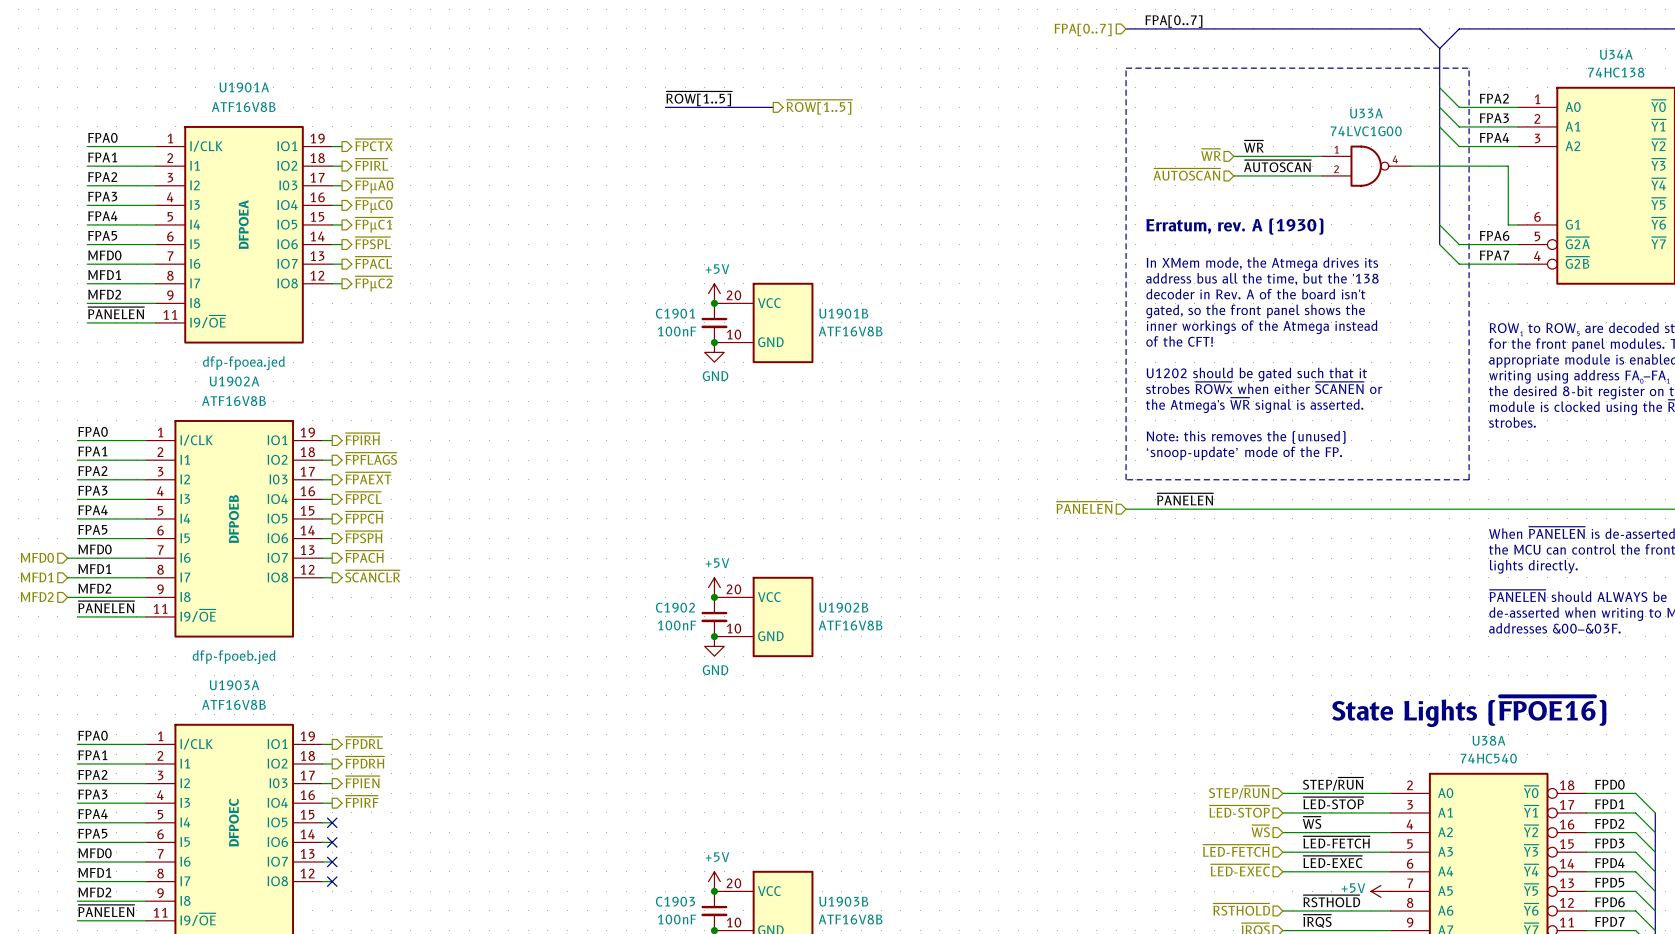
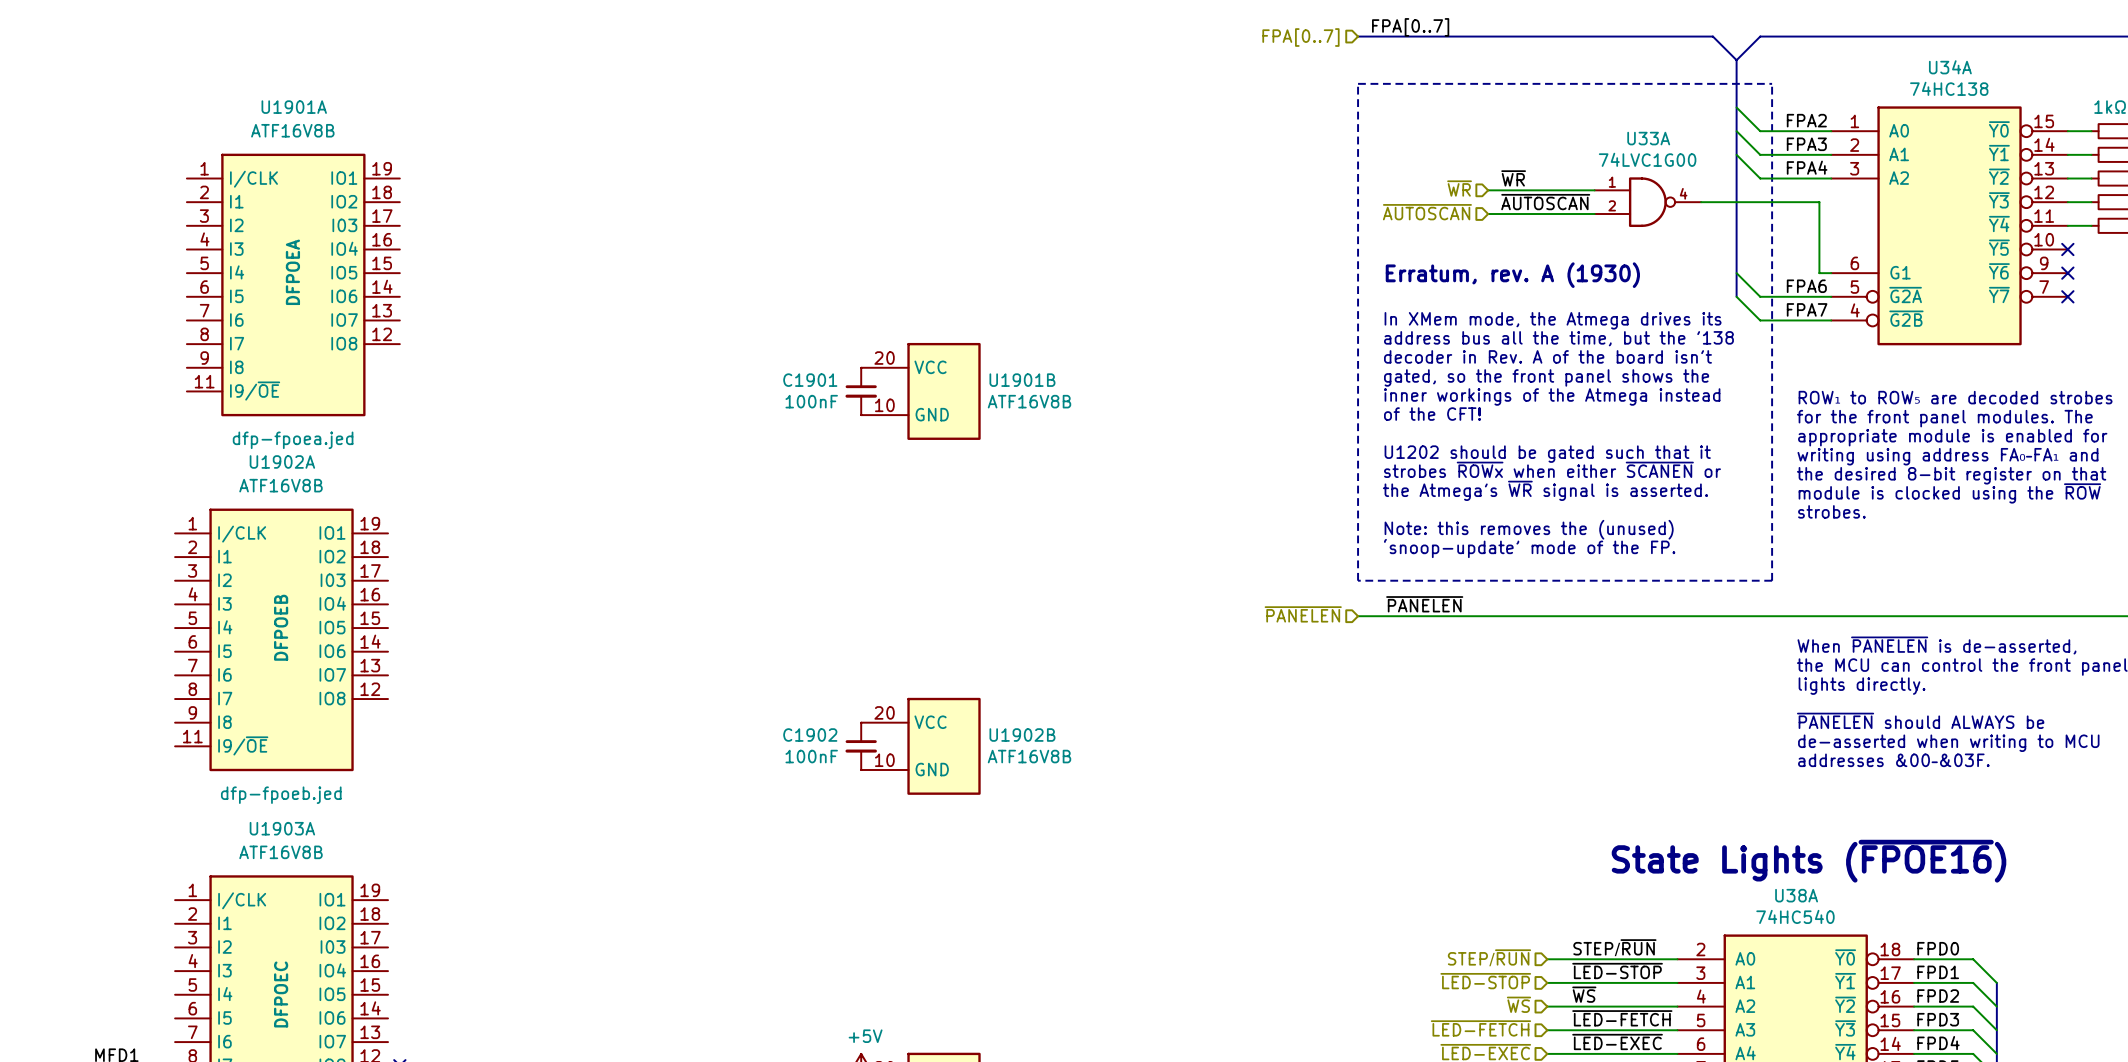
label: ~{ROW[1..5]} (699, 98) -> none
bus: (665, 107) (773, 107) -> none
hierarchical label: ~{ROW[1..5]} (819, 107) -> none
label: FPA0 (102, 137) -> none
hierarchical label: ~{FPCTX} (374, 145) -> none
wire: (87, 146) (155, 146) -> none
wire: (332, 146) (342, 146) -> none
label: FPA1 (102, 157) -> none
hierarchical label: ~{FPIRL} (371, 164) -> none
wire: (87, 166) (155, 166) -> none
wire: (332, 166) (342, 166) -> none
label: FPA2 (102, 177) -> none
wire: (87, 185) (155, 185) -> none
wire: (332, 185) (342, 185) -> none
hierarchical label: ~{FPµA0} (374, 185) -> none
label: FPA3 (102, 196) -> none
wire: (87, 205) (155, 205) -> none
wire: (332, 205) (342, 205) -> none
hierarchical label: ~{FPµC0} (374, 205) -> none
label: FPA4 (102, 216) -> none
wire: (87, 224) (155, 224) -> none
wire: (332, 224) (342, 224) -> none
hierarchical label: ~{FPµC1} (374, 225) -> none
label: FPA5 (102, 235) -> none
hierarchical label: ~{FPSPL} (373, 243) -> none
wire: (87, 244) (155, 244) -> none
wire: (332, 244) (342, 244) -> none
label: MFD0 (104, 255) -> none
hierarchical label: ~{FPACL} (373, 262) -> none
wire: (87, 264) (155, 264) -> none
wire: (332, 264) (342, 264) -> none
label: MFD1 (104, 275) -> none
wire: (87, 283) (155, 283) -> none
wire: (332, 283) (342, 283) -> none
hierarchical label: ~{FPµC2} (374, 283) -> none
power symbol: +5V (714, 293) -> none
label: MFD2 (104, 294) -> none
wire: (87, 303) (155, 303) -> none
junction: (714, 303) -> none
label: ~{PANELEN} (116, 313) -> none
wire: (87, 322) (155, 322) -> none
junction: (714, 342) -> none
power symbol: GND (714, 352) -> none
label: FPA0 (93, 431) -> none
hierarchical label: ~{FPIRH} (362, 439) -> none
wire: (77, 440) (146, 440) -> none
wire: (322, 440) (332, 440) -> none
label: FPA1 (92, 451) -> none
hierarchical label: ~{FPFLAGS} (371, 458) -> none
wire: (77, 460) (146, 460) -> none
wire: (322, 460) (332, 460) -> none
label: FPA2 (92, 471) -> none
hierarchical label: ~{FPAEXT} (368, 478) -> none
wire: (77, 479) (146, 479) -> none
wire: (322, 479) (332, 479) -> none
label: FPA3 (92, 490) -> none
hierarchical label: ~{FPPCL} (363, 497) -> none
wire: (77, 499) (146, 499) -> none
wire: (322, 499) (332, 499) -> none
label: FPA4 (93, 510) -> none
hierarchical label: ~{FPPCH} (364, 517) -> none
wire: (77, 518) (146, 518) -> none
wire: (322, 518) (332, 518) -> none
label: FPA5 (92, 529) -> none
hierarchical label: ~{FPSPH} (364, 537) -> none
wire: (77, 538) (146, 538) -> none
wire: (322, 538) (332, 538) -> none
label: MFD0 (95, 549) -> none
hierarchical label: ~{FPACH} (364, 556) -> none
hierarchical label: MFD0 (37, 557) -> none
wire: (67, 558) (146, 558) -> none
wire: (322, 558) (332, 558) -> none
label: MFD1 (94, 569) -> none
hierarchical label: ~{SCANCLR} (372, 576) -> none
hierarchical label: MFD1 (37, 577) -> none
wire: (67, 577) (146, 577) -> none
wire: (322, 577) (332, 577) -> none
power symbol: +5V (714, 587) -> none
label: MFD2 (94, 588) -> none
hierarchical label: MFD2 (37, 597) -> none
wire: (67, 597) (146, 597) -> none
junction: (714, 597) -> none
label: ~{PANELEN} (106, 607) -> none
wire: (77, 616) (146, 616) -> none
junction: (714, 636) -> none
power symbol: GND (714, 646) -> none
label: FPA0 (93, 735) -> none
hierarchical label: ~{FPDRL} (364, 742) -> none
wire: (77, 744) (146, 744) -> none
wire: (322, 744) (332, 744) -> none
label: FPA1 (92, 755) -> none
hierarchical label: ~{FPDRH} (364, 762) -> none
wire: (77, 763) (146, 763) -> none
wire: (322, 763) (332, 763) -> none
label: FPA2 (92, 774) -> none
hierarchical label: ~{FPIEN} (362, 782) -> none
wire: (77, 783) (146, 783) -> none
wire: (322, 783) (332, 783) -> none
label: FPA3 (92, 794) -> none
hierarchical label: ~{FPIRF} (362, 801) -> none
wire: (77, 803) (146, 803) -> none
wire: (322, 803) (332, 803) -> none
label: FPA4 (93, 814) -> none
wire: (77, 822) (146, 822) -> none
wire: (322, 822) (332, 822) -> none
no-connect mark: (332, 822) -> none
label: FPA5 (92, 833) -> none
wire: (77, 842) (146, 842) -> none
wire: (322, 842) (332, 842) -> none
no-connect mark: (332, 842) -> none
label: MFD0 (95, 853) -> none
wire: (77, 861) (146, 861) -> none
wire: (322, 861) (332, 861) -> none
no-connect mark: (332, 861) -> none

